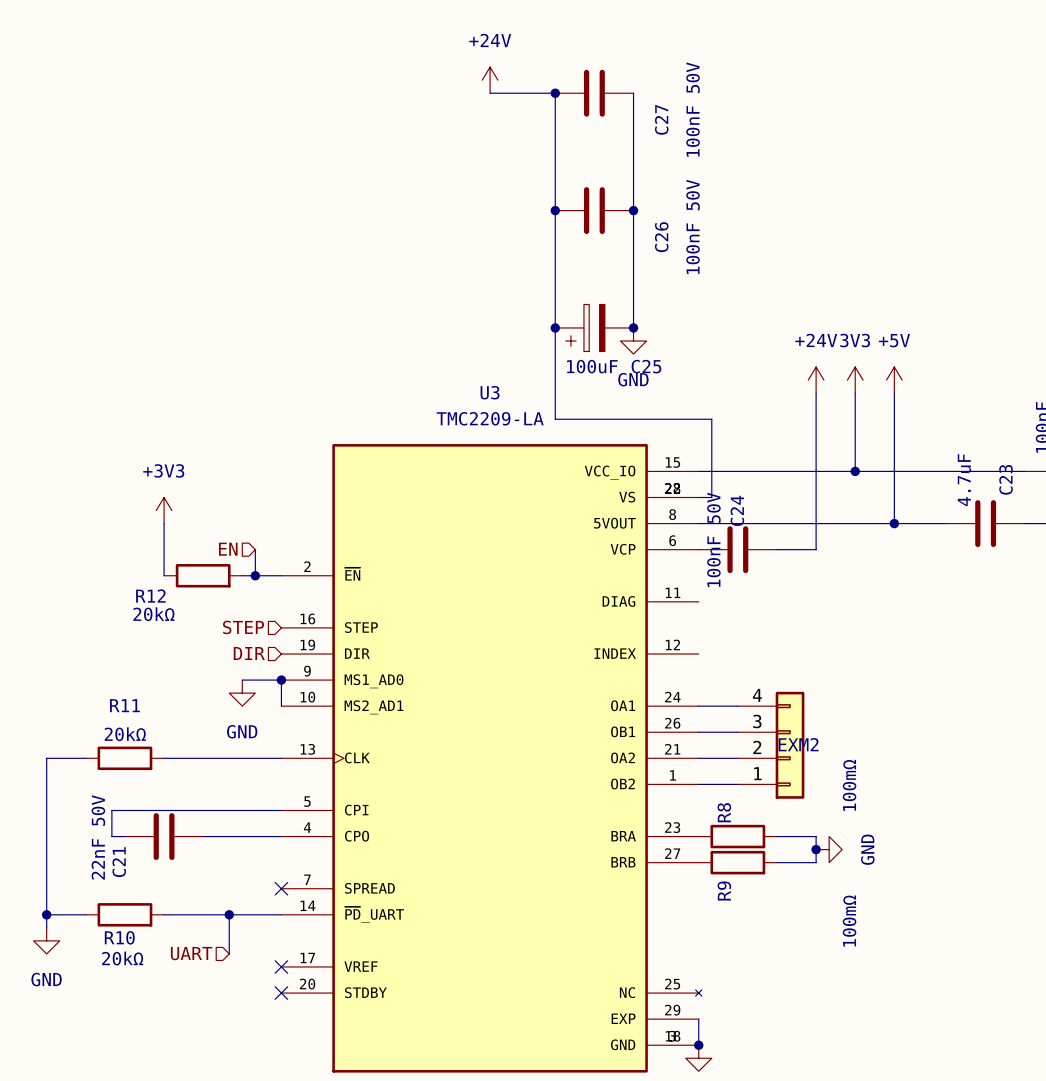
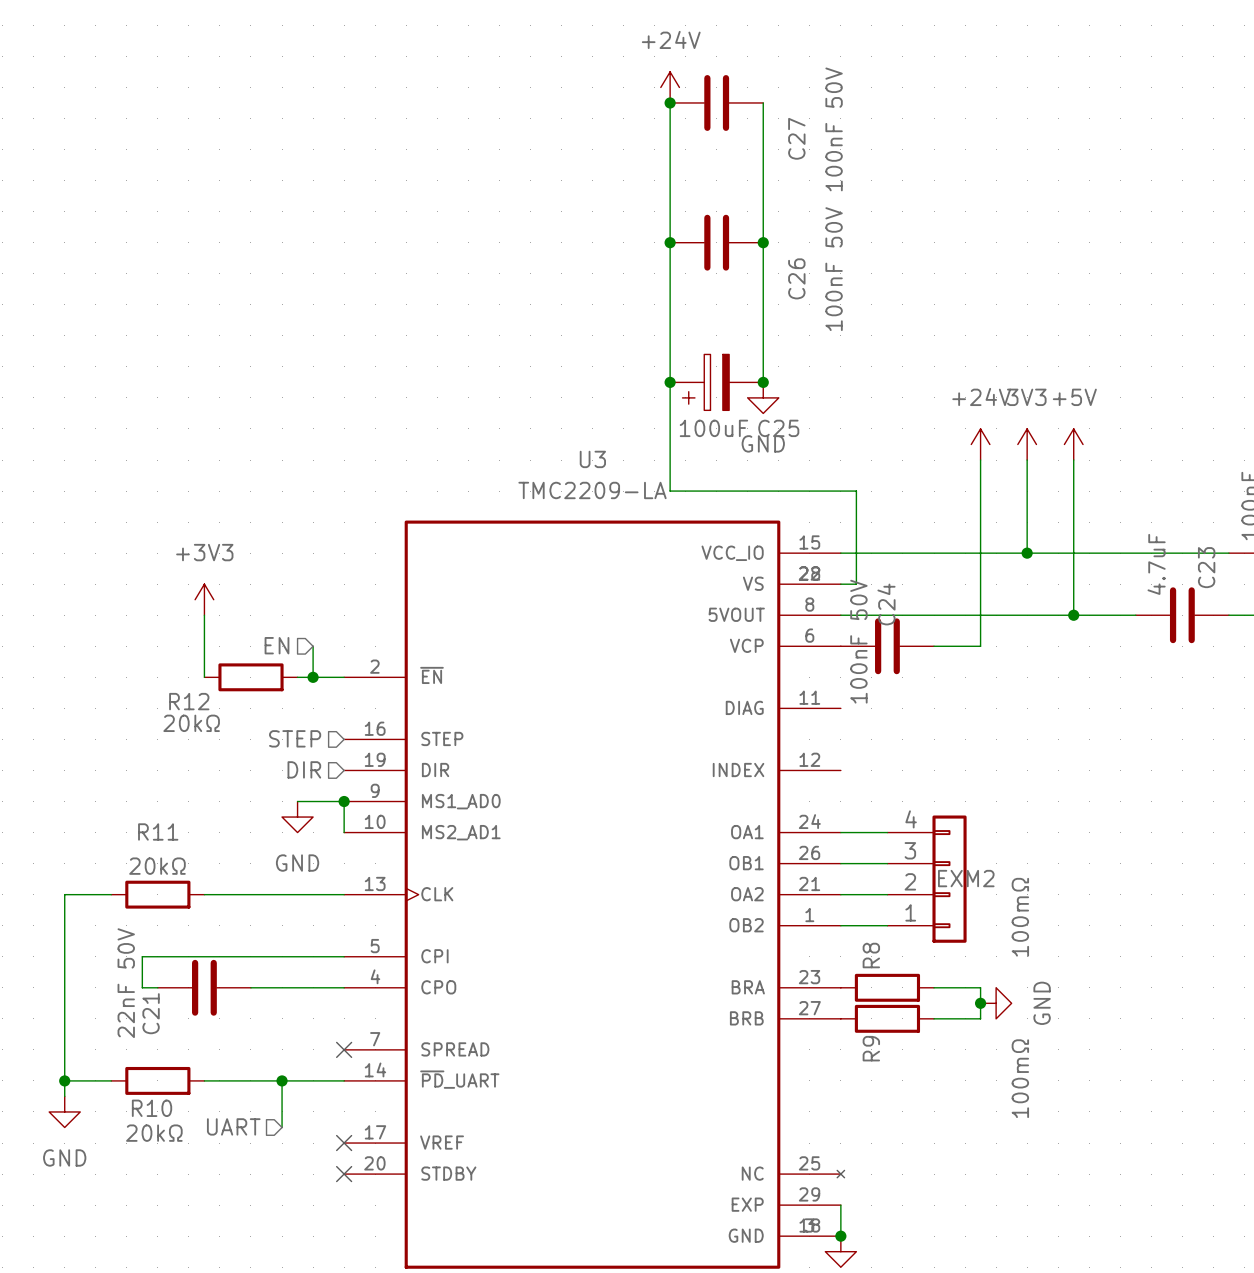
power symbol position: +24V (490, 80) -> +24V (670, 87)
wire: (490, 93) (555, 93) -> none

